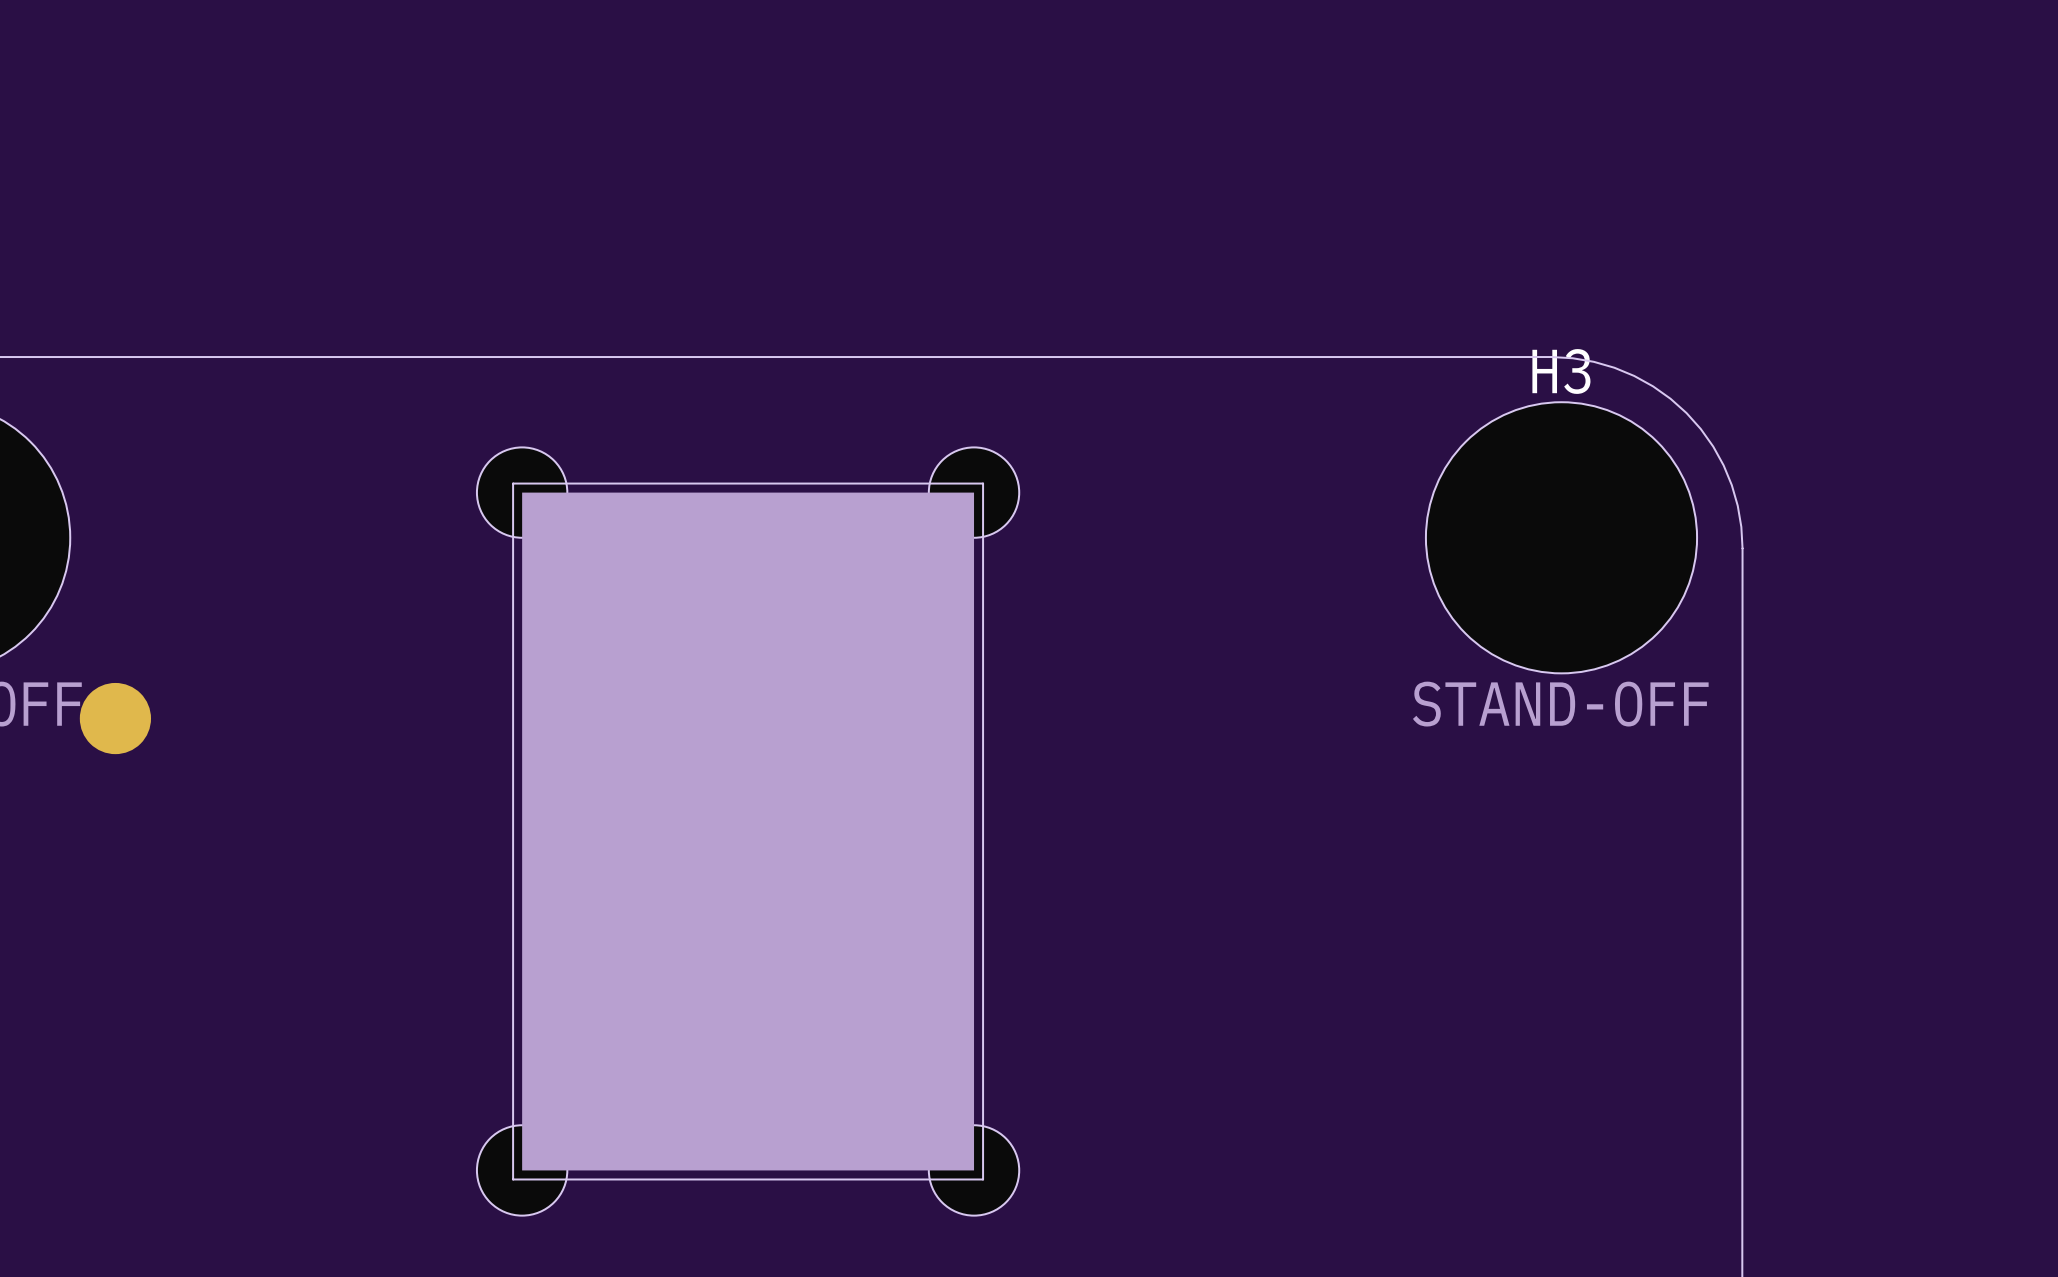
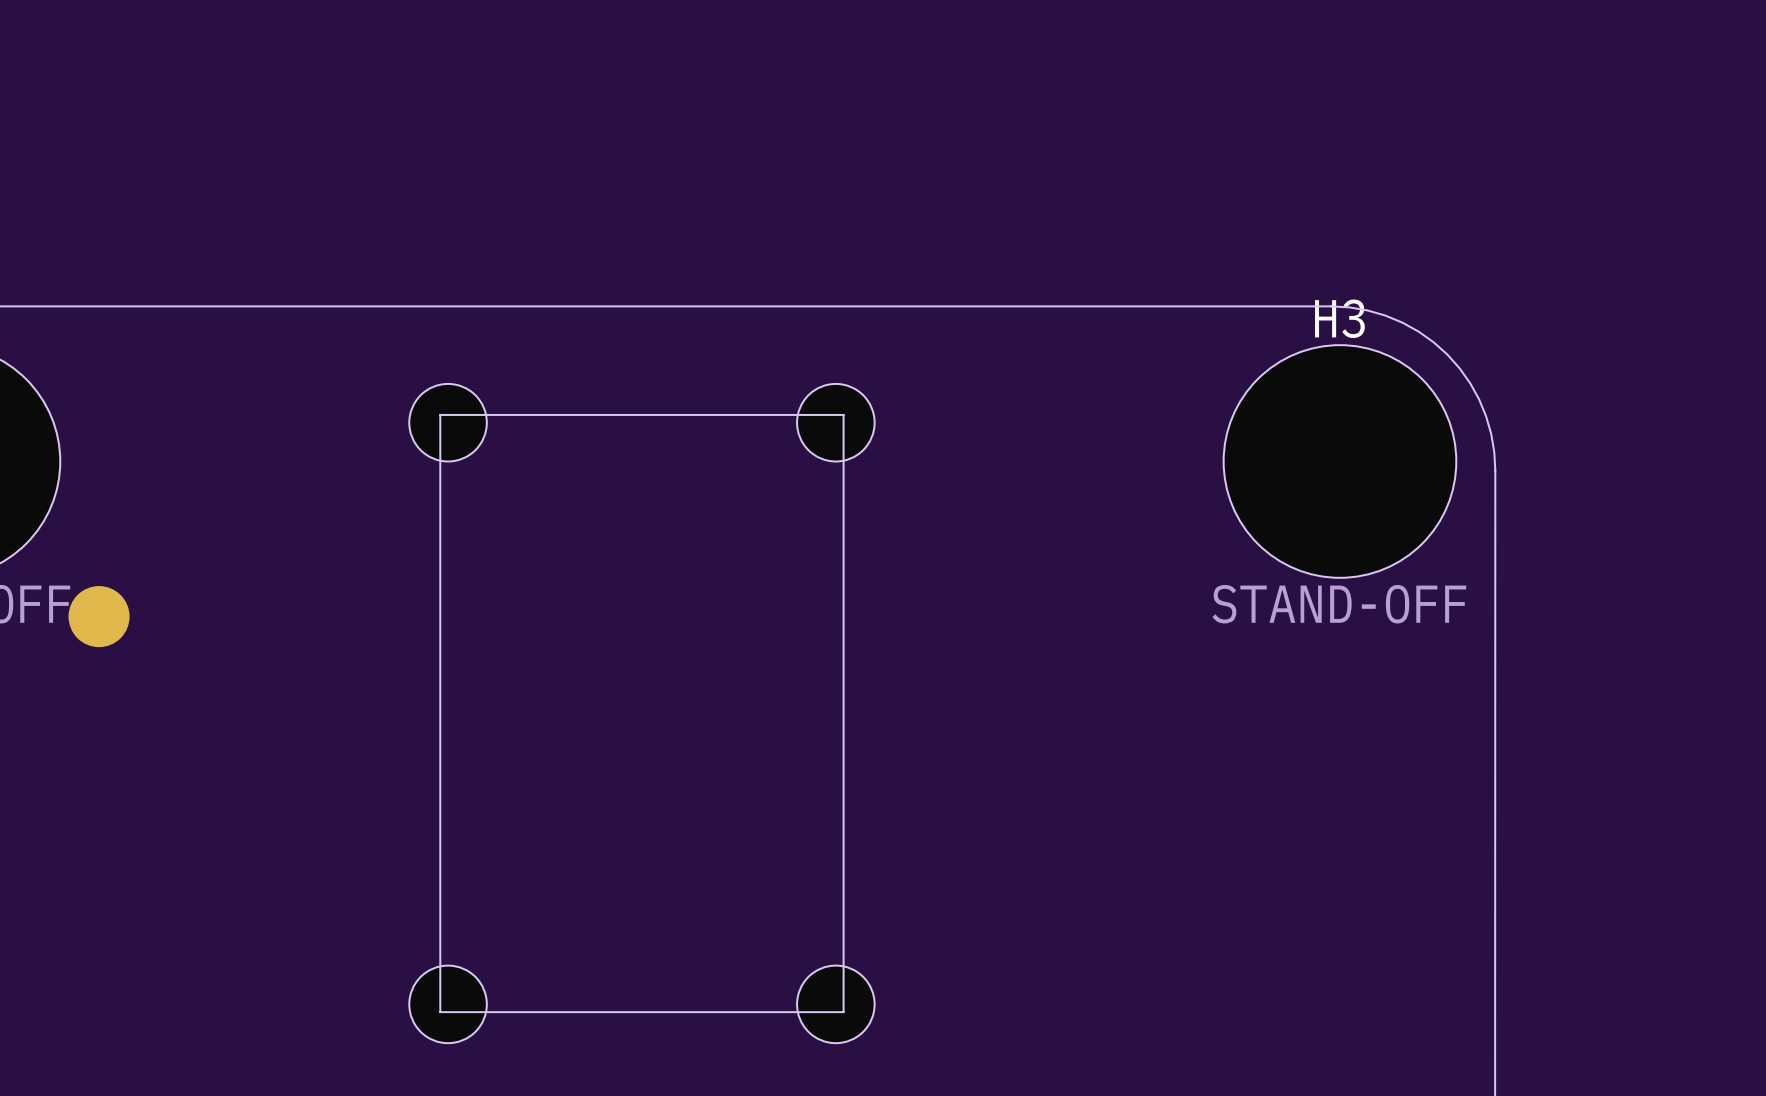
drawing: [522, 492, 975, 1171] -> none

